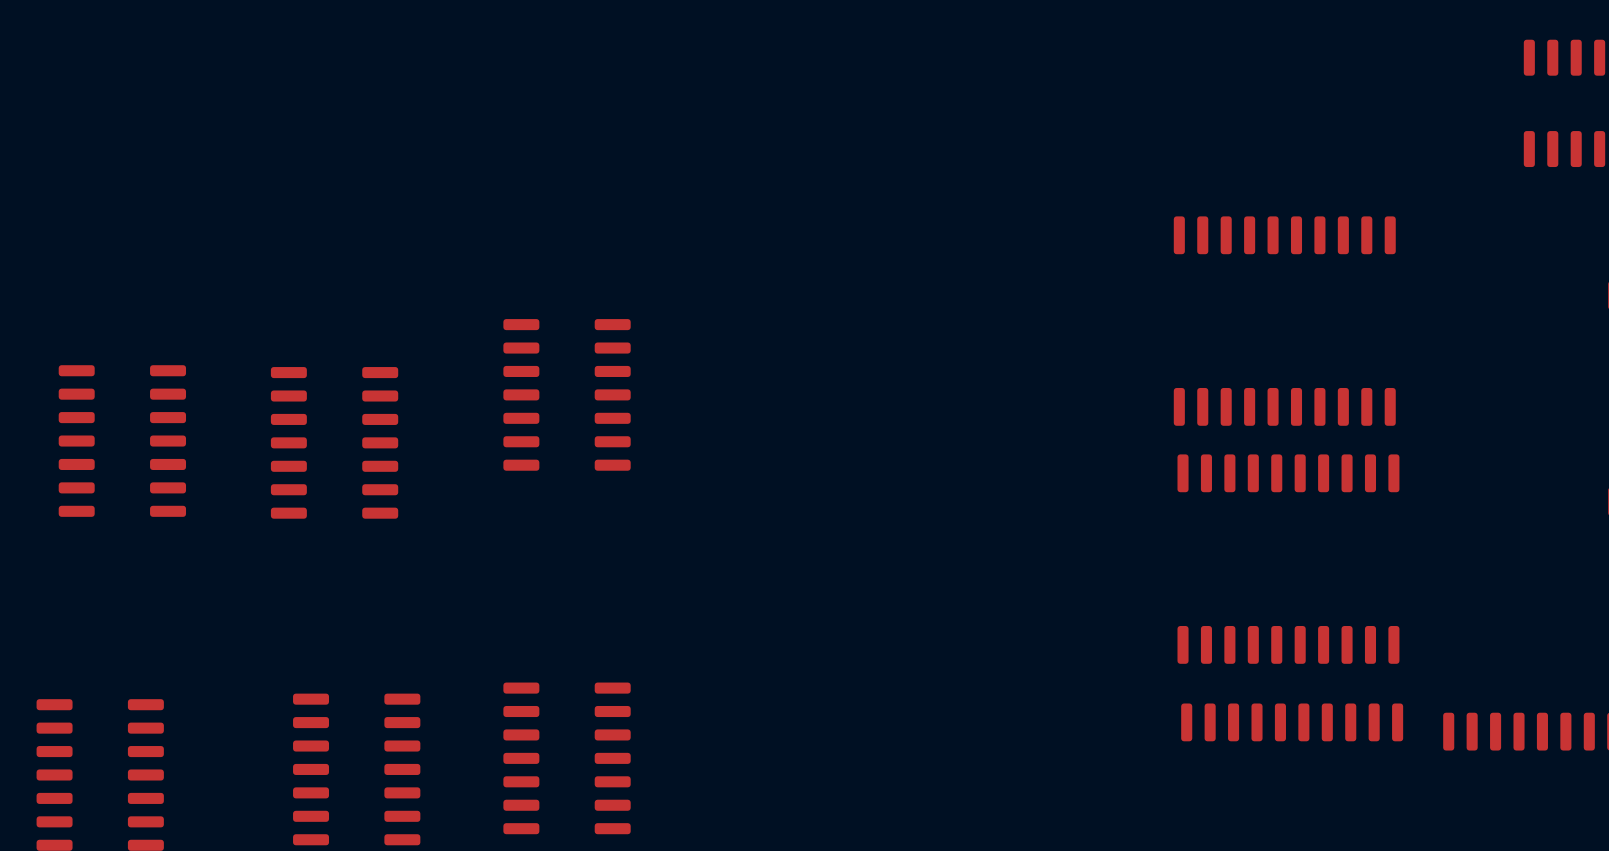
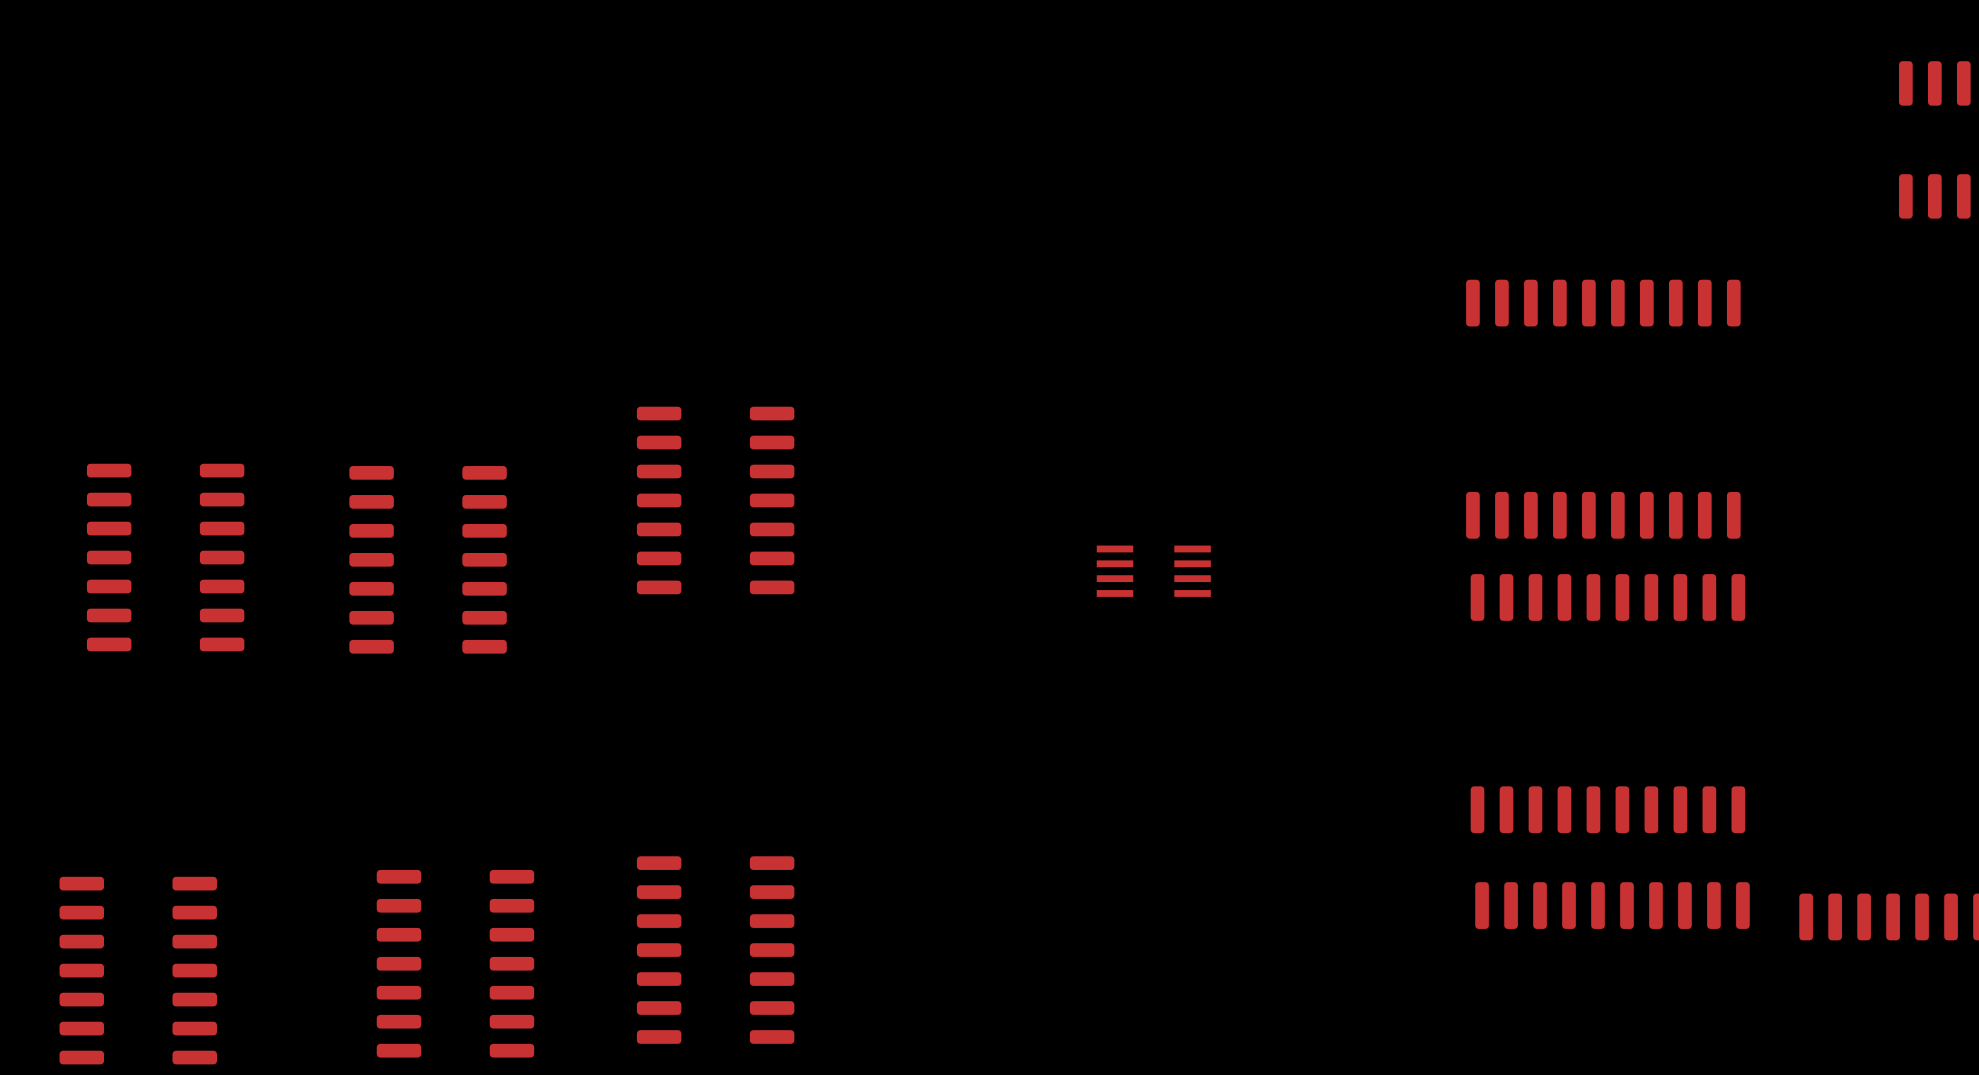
part: none -> (1153, 571)

